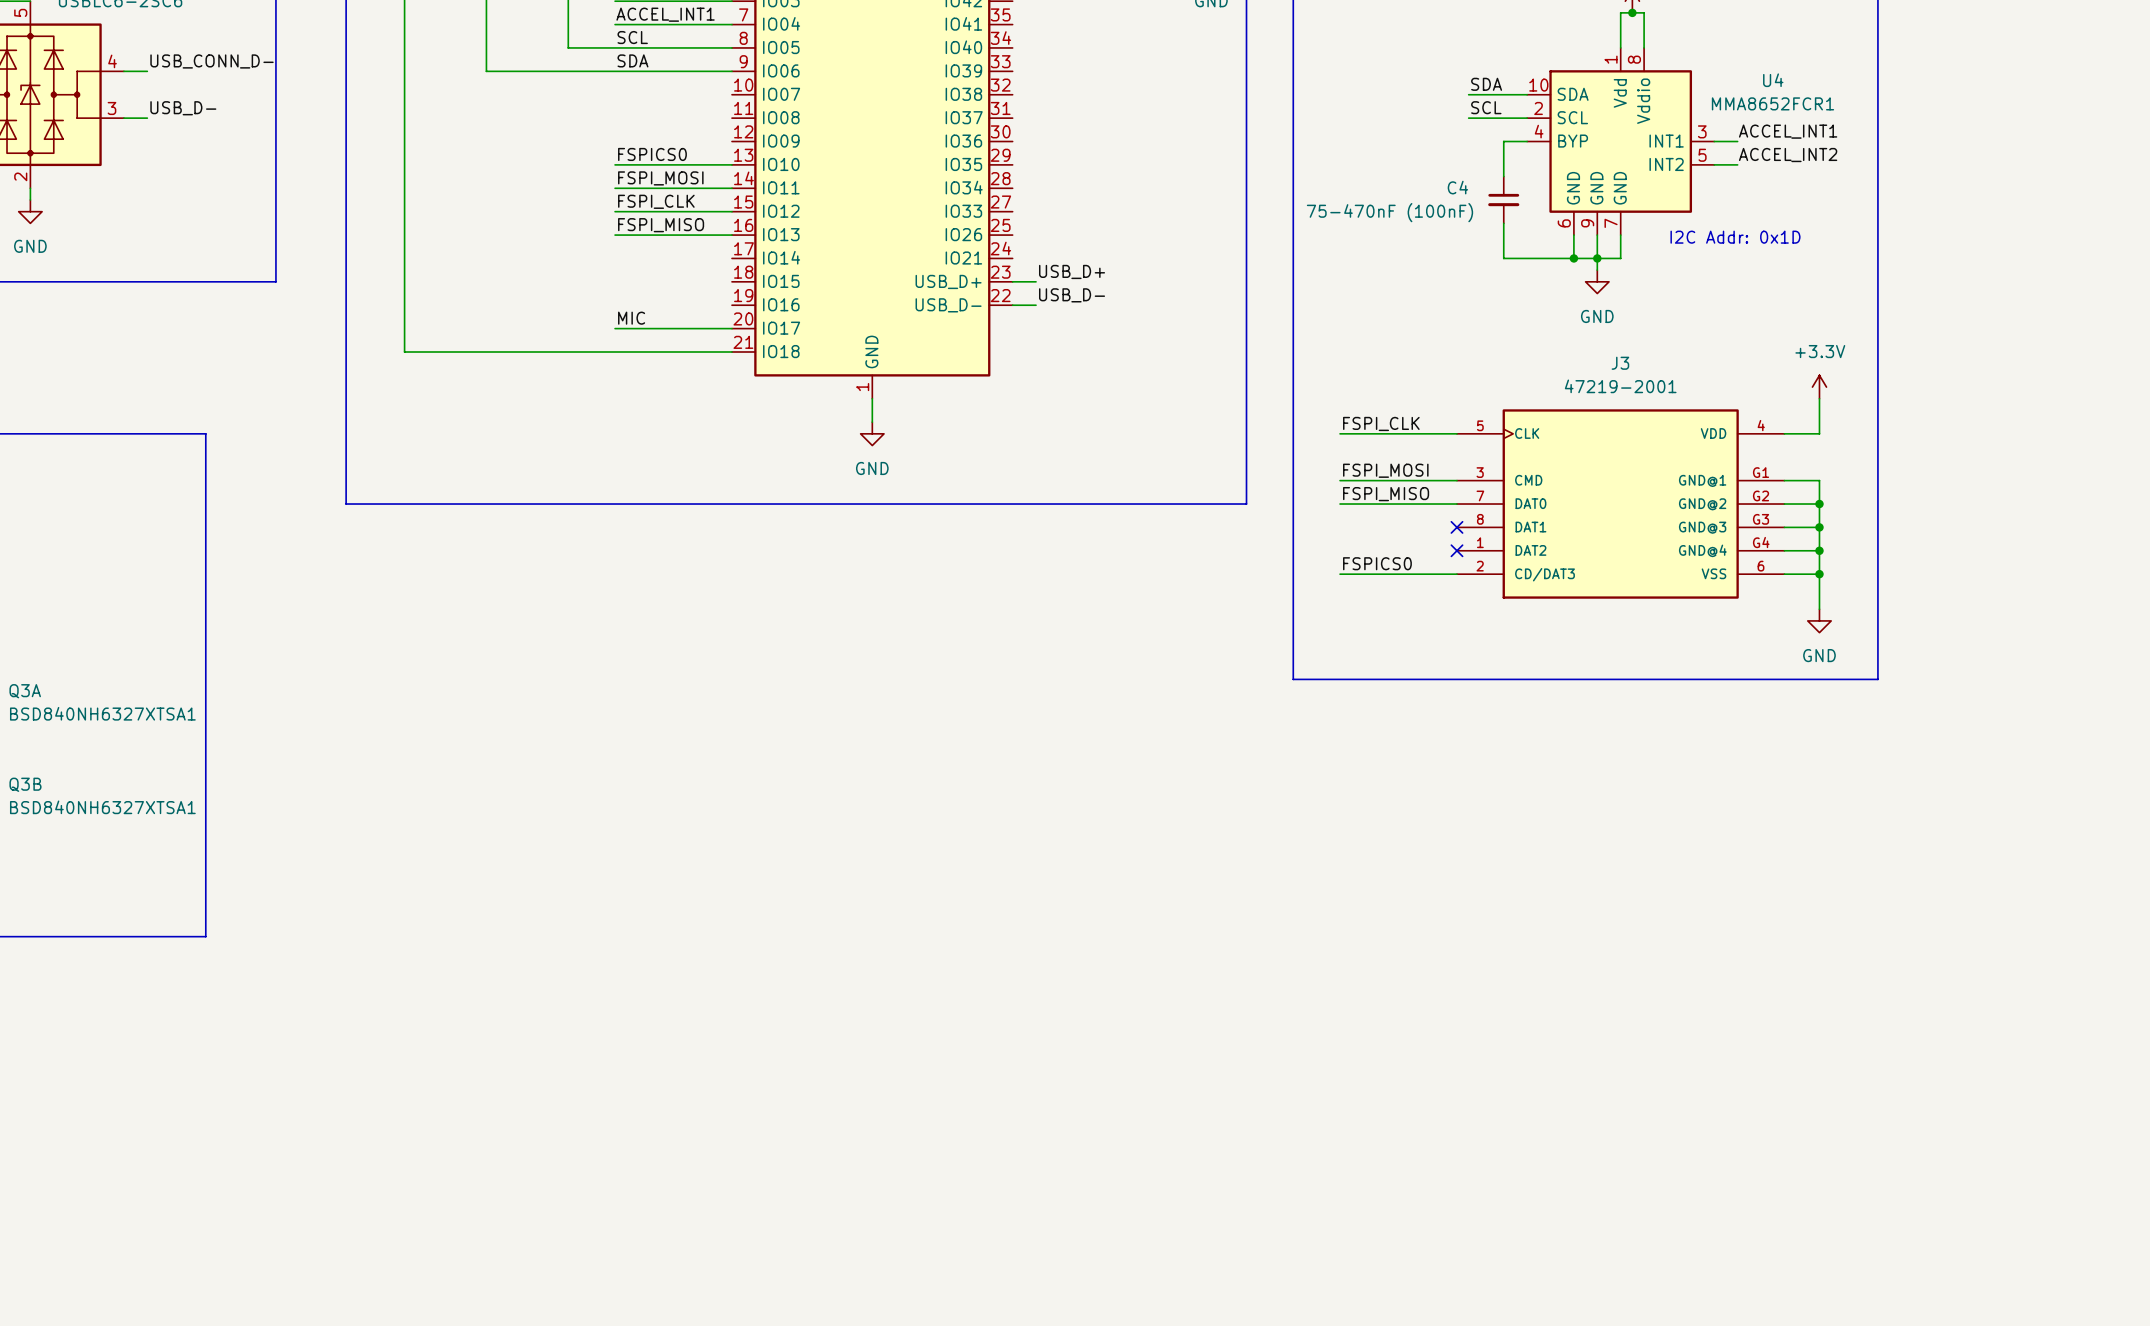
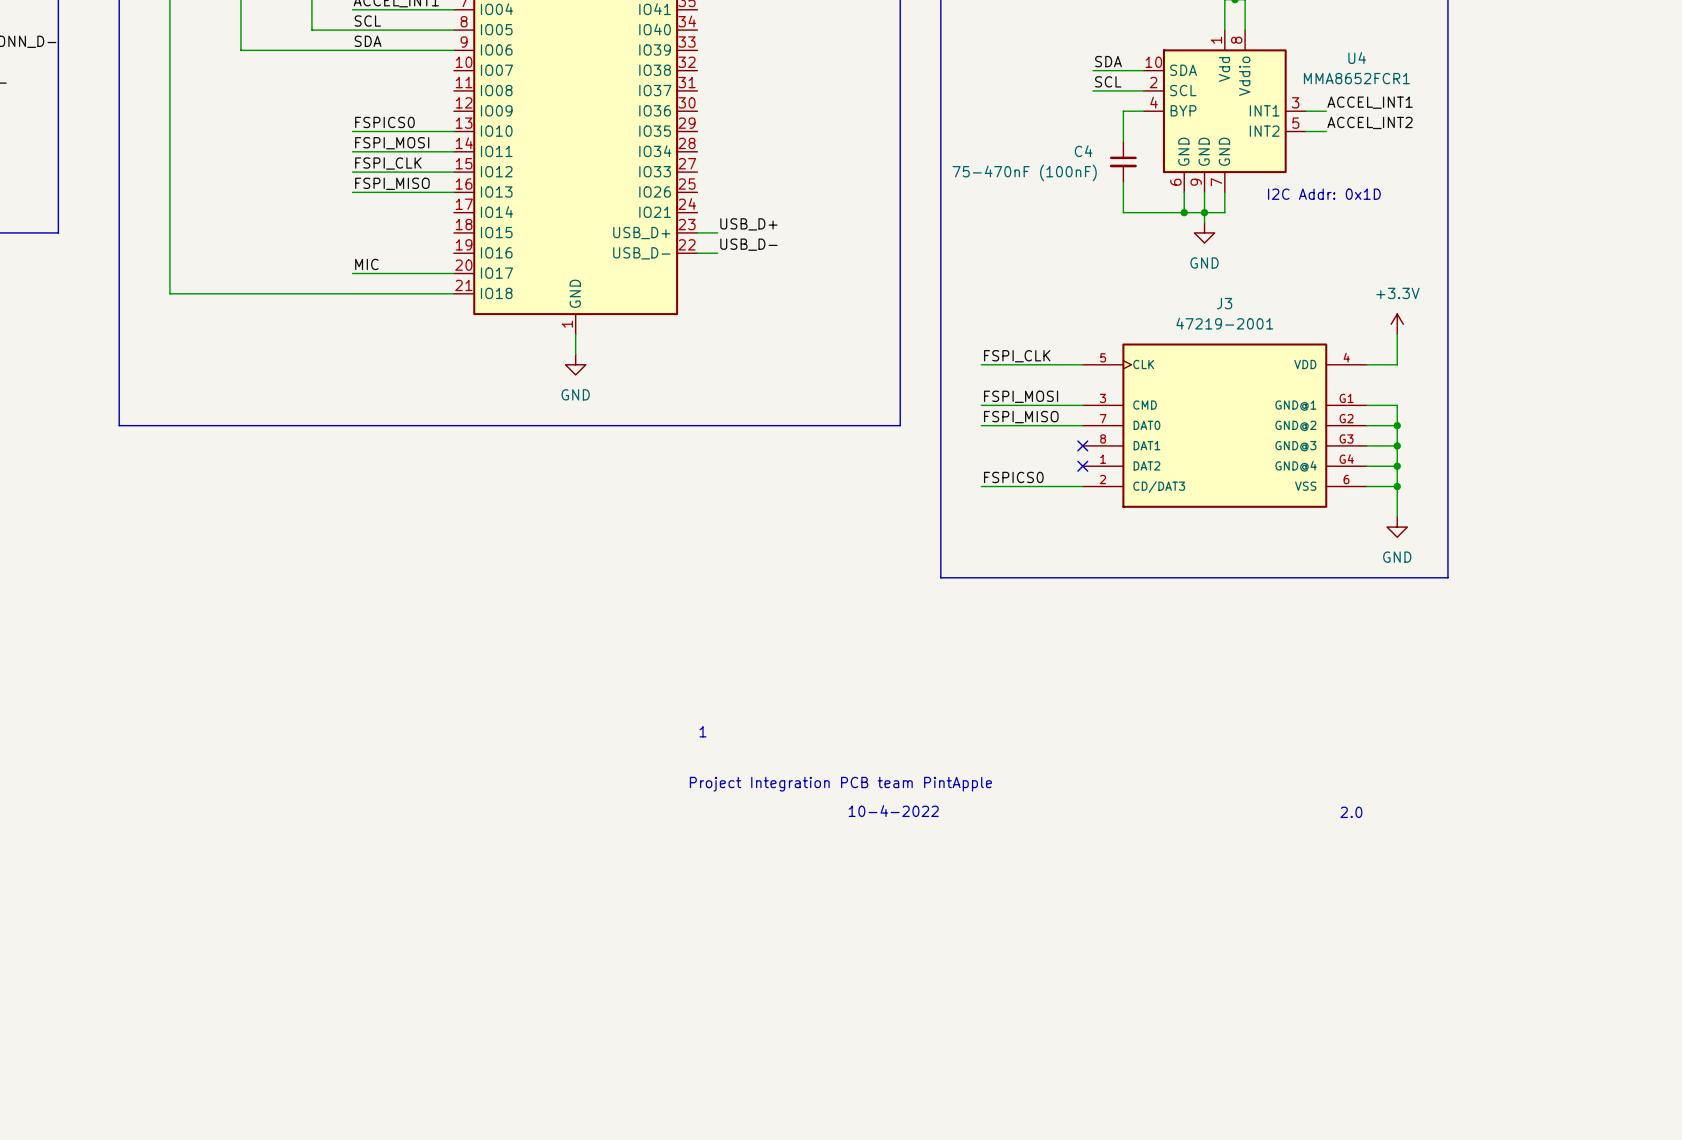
text: none -> 1 (703, 731)
text: none -> Project Integration PCB team PintApple (840, 784)
text: none -> 10-4-2022 (893, 811)
text: none -> 2.0 (1351, 812)

